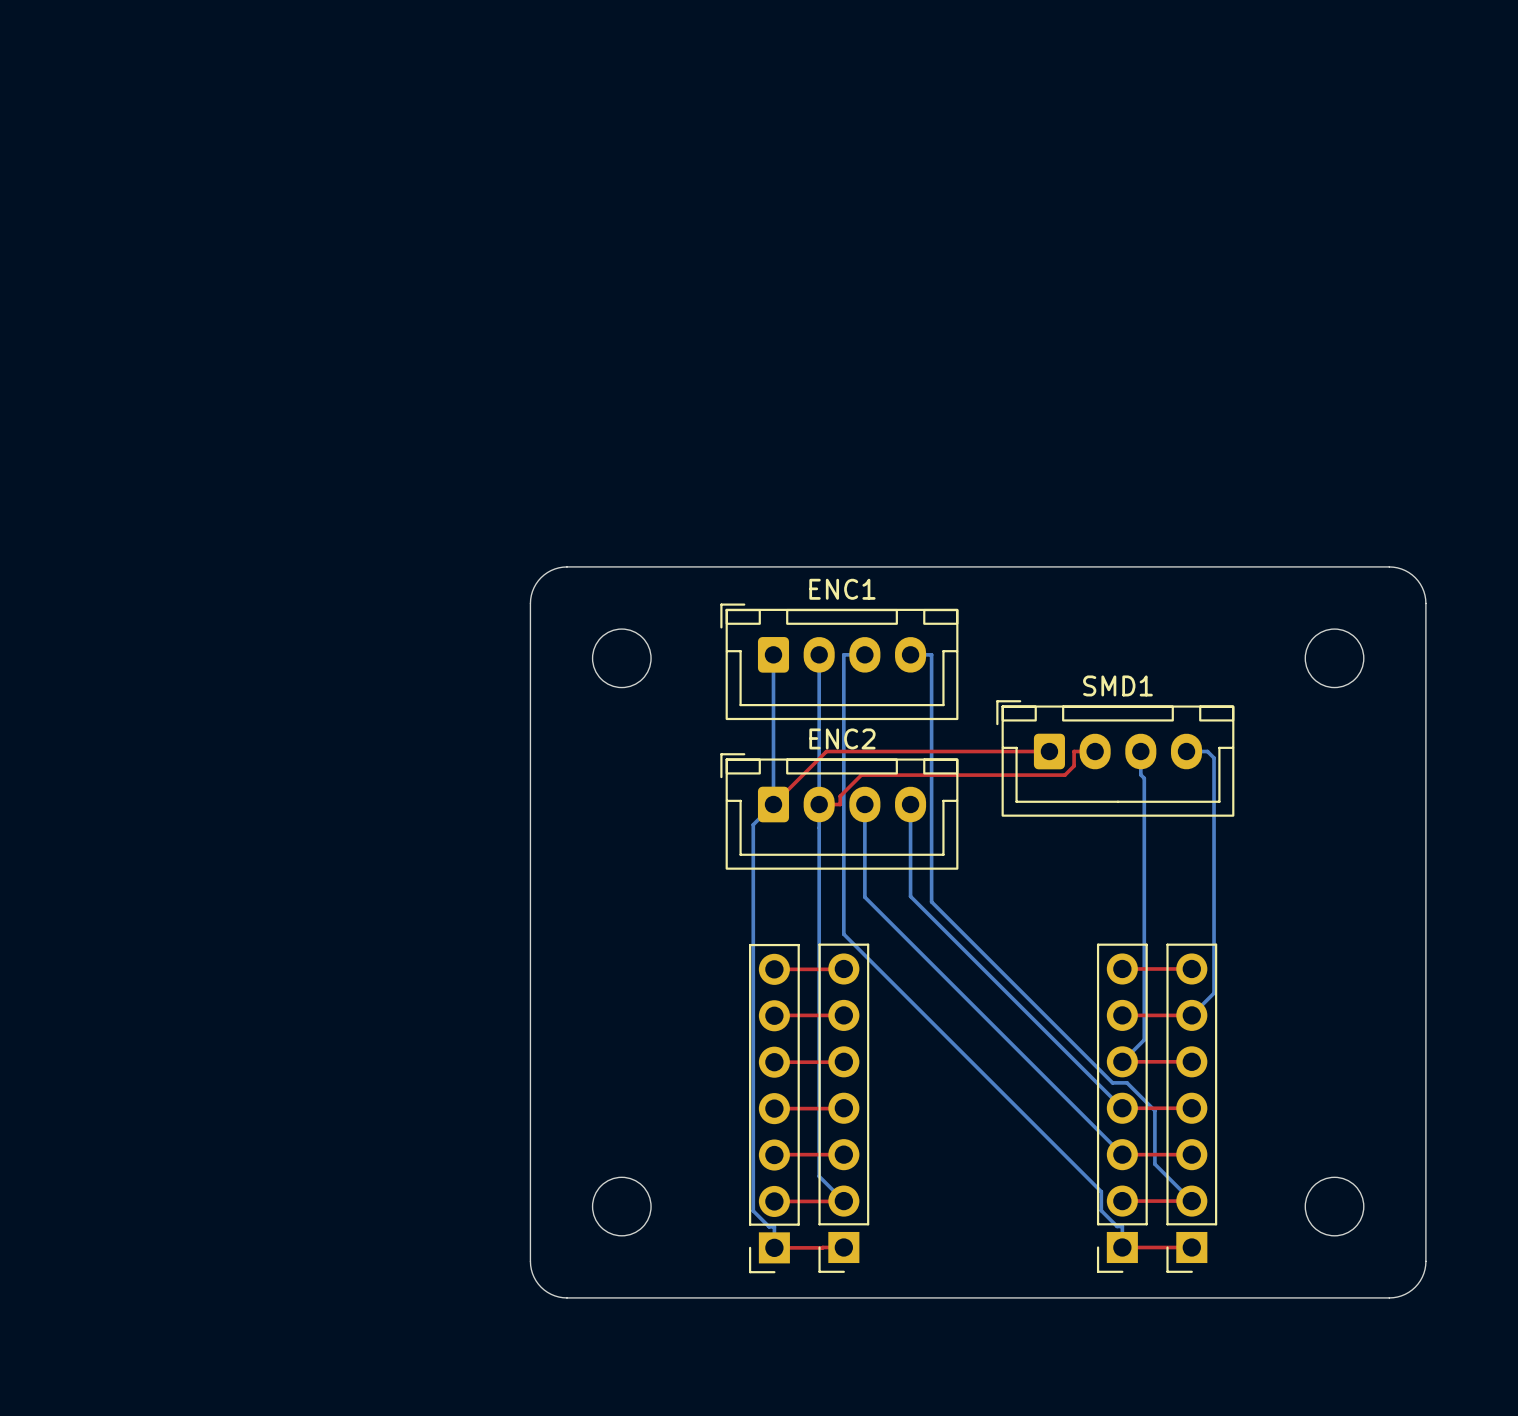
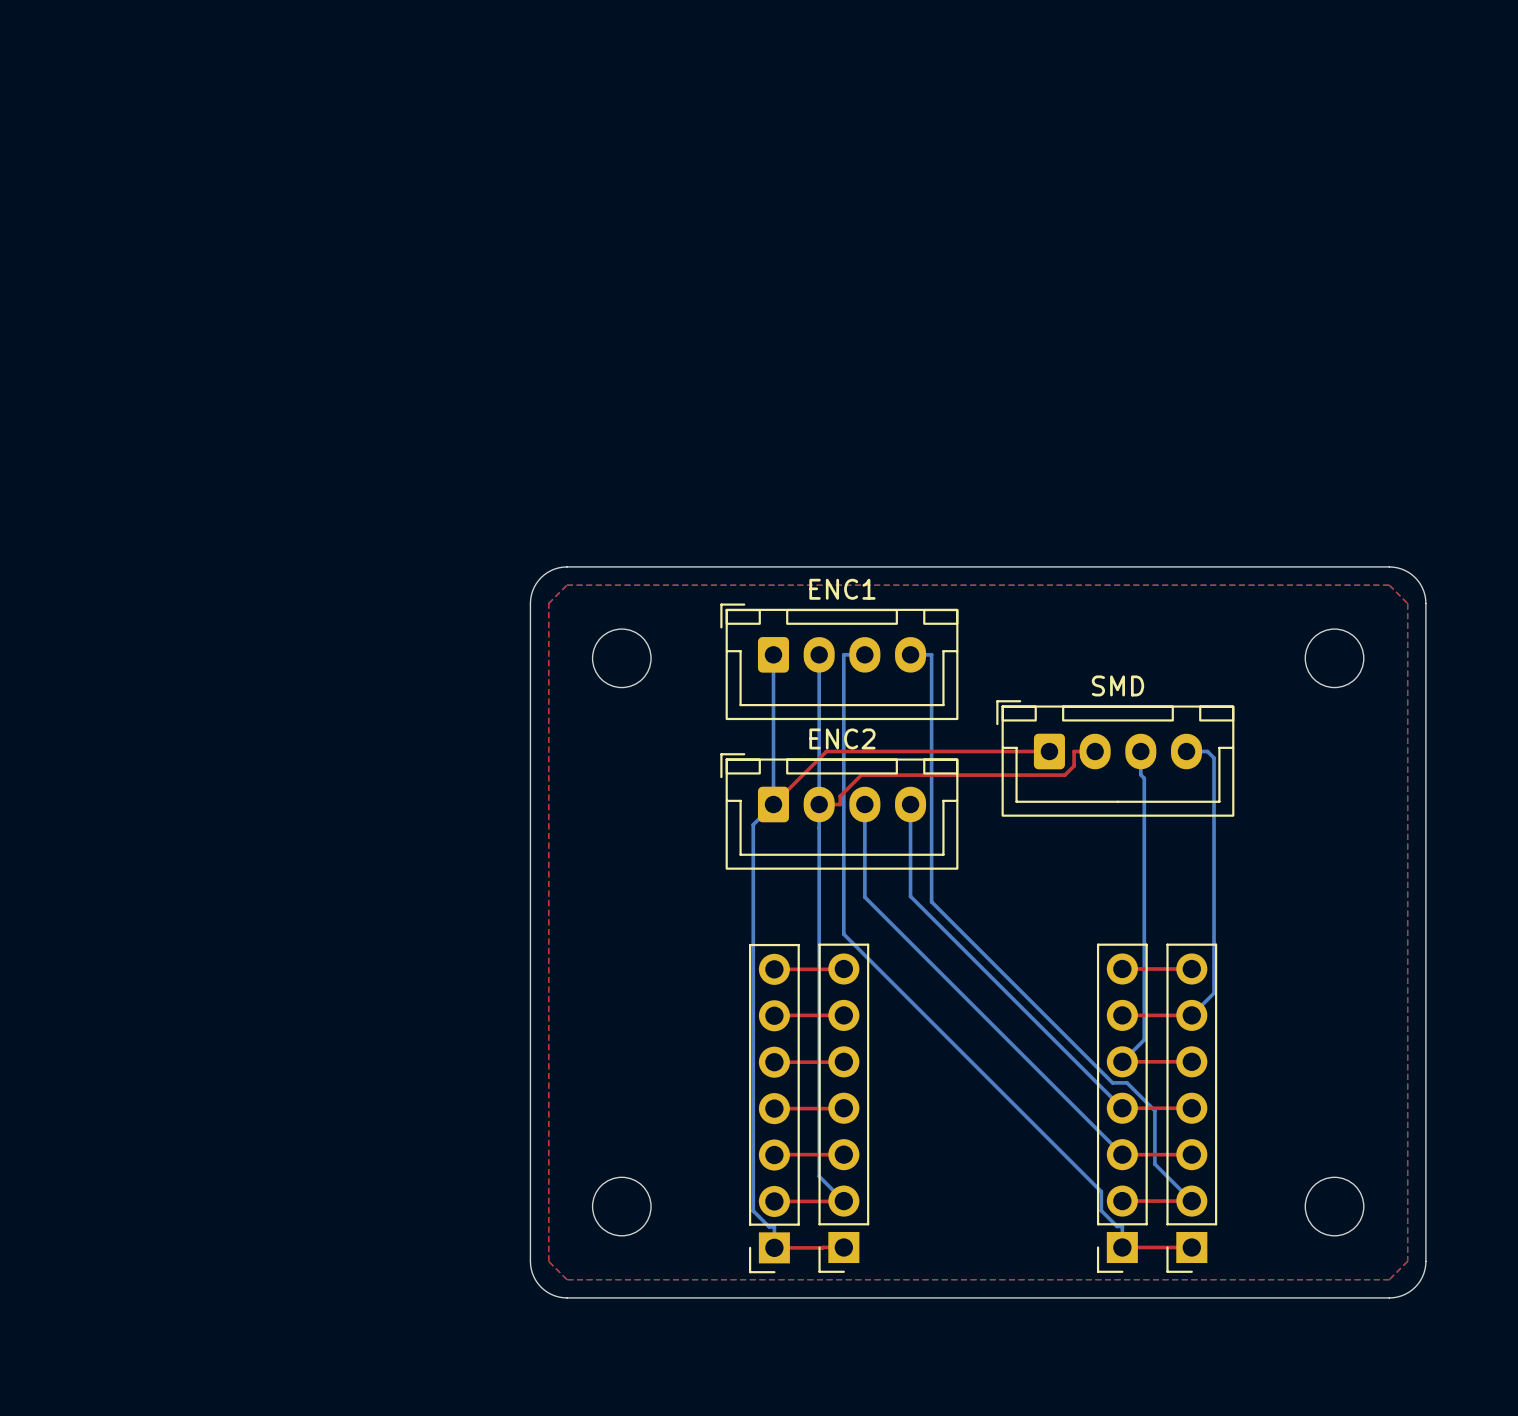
top zone outline: none -> (566, 585) (1389, 585) (1407, 603) (1407, 1261) (1389, 1279) (566, 1279) (548, 1261) (548, 603) (566, 585)
SMD1 name: SMD1 (1117, 685) -> SMD (1117, 685)

